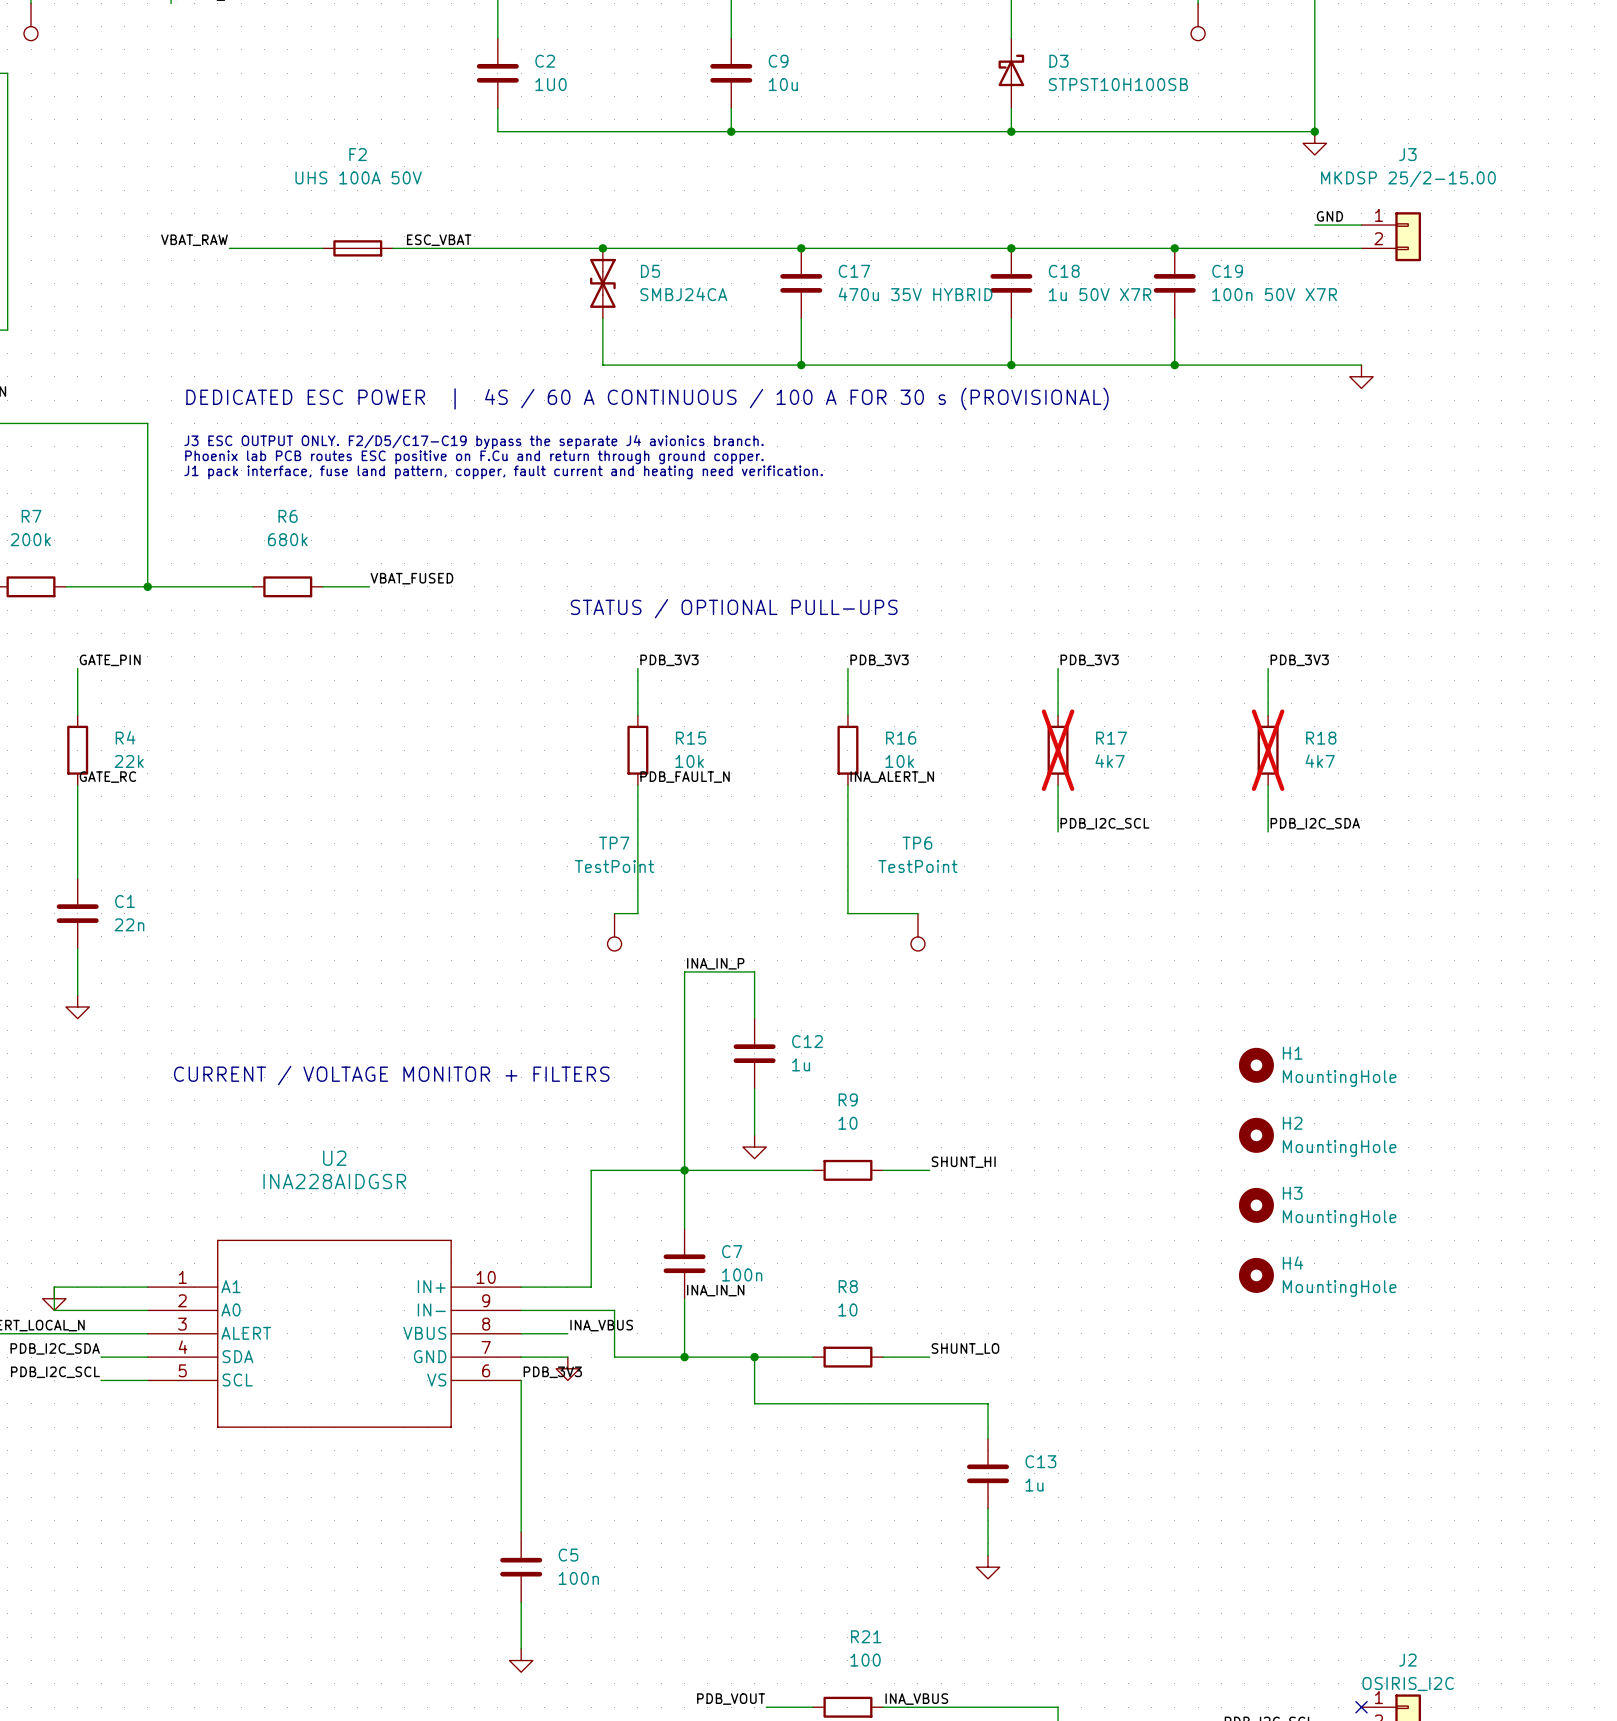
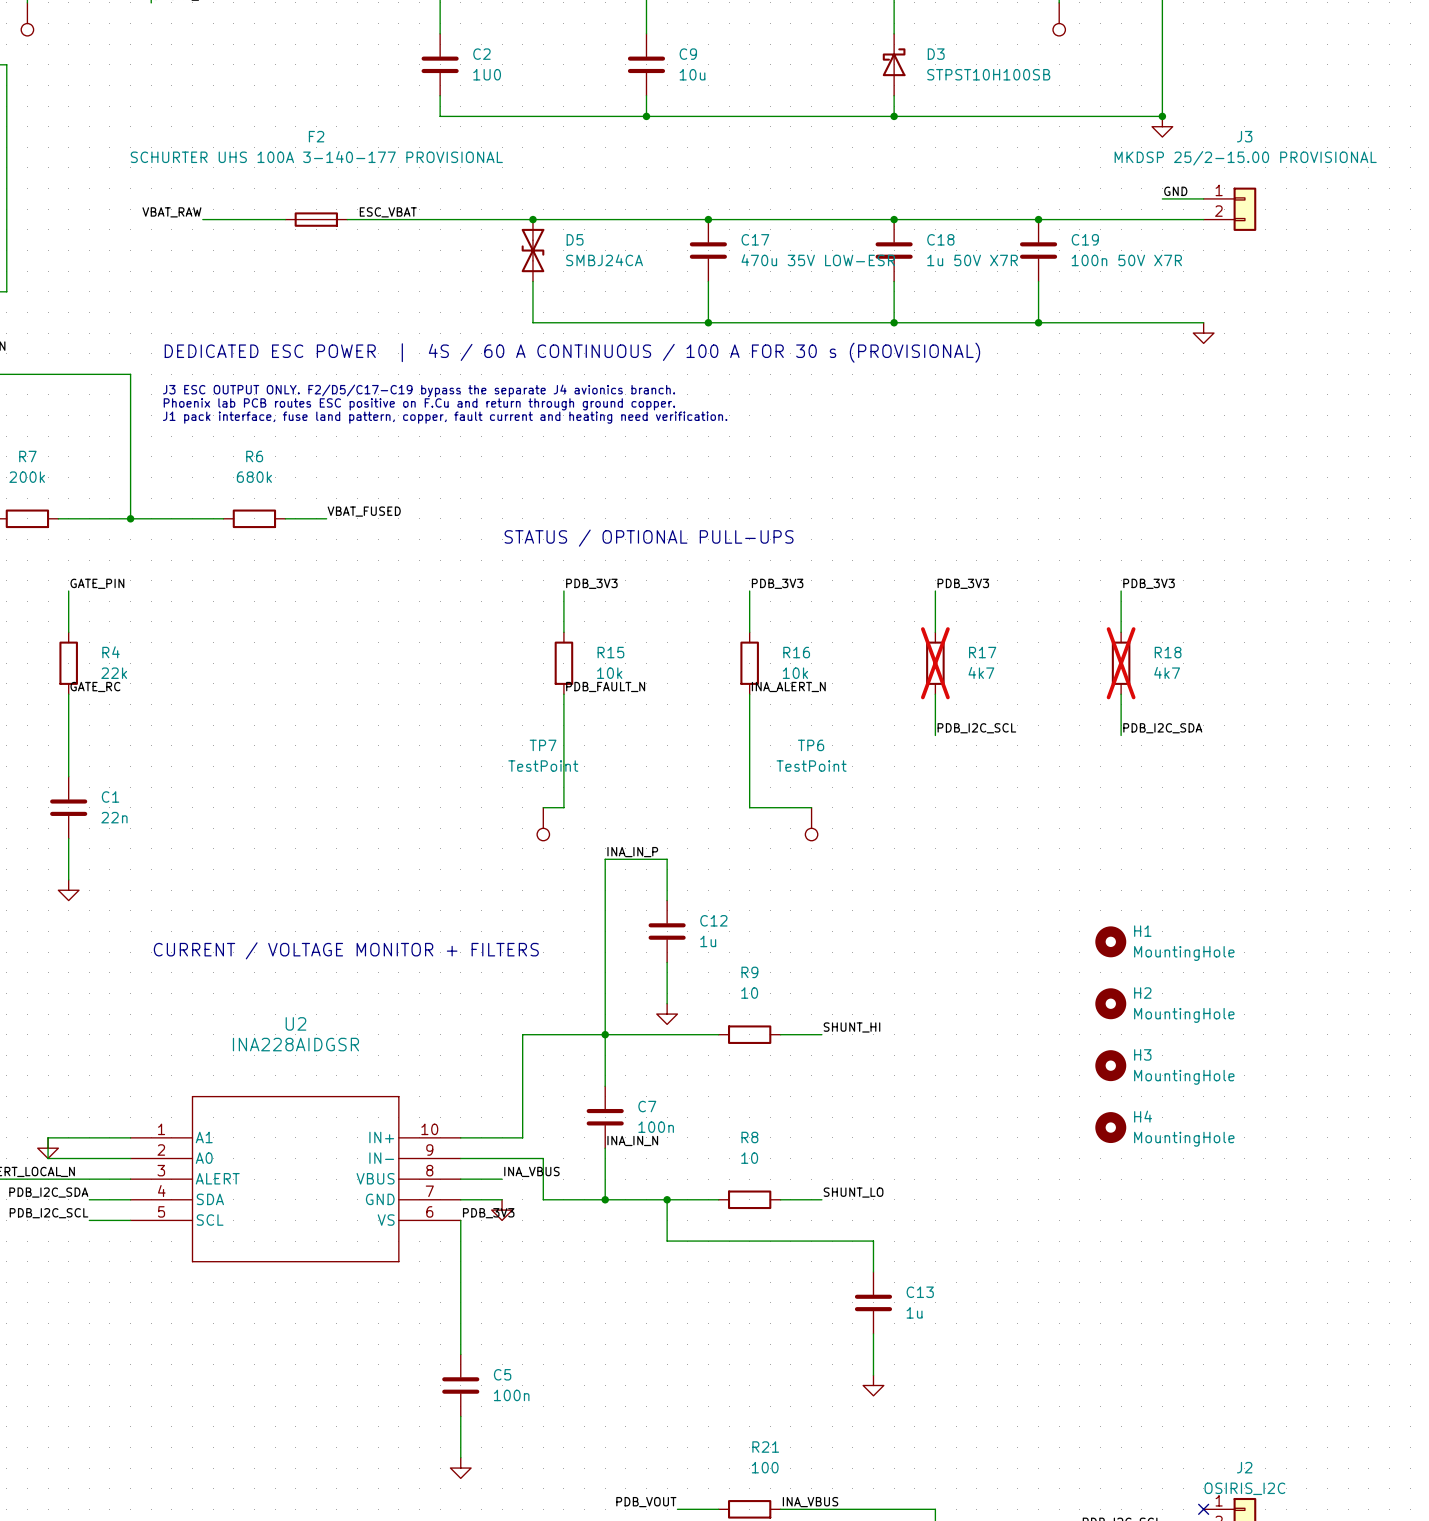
F2 value: UHS 100A 50V (358, 177) -> SCHURTER UHS 100A 3-140-177 PROVISIONAL (316, 157)
J3 value: MKDSP 25/2-15.00 (1408, 179) -> MKDSP 25/2-15.00 PROVISIONAL (1245, 158)
C17 value: 470u 35V HYBRID (915, 294) -> 470u 35V LOW-ESR (818, 260)

